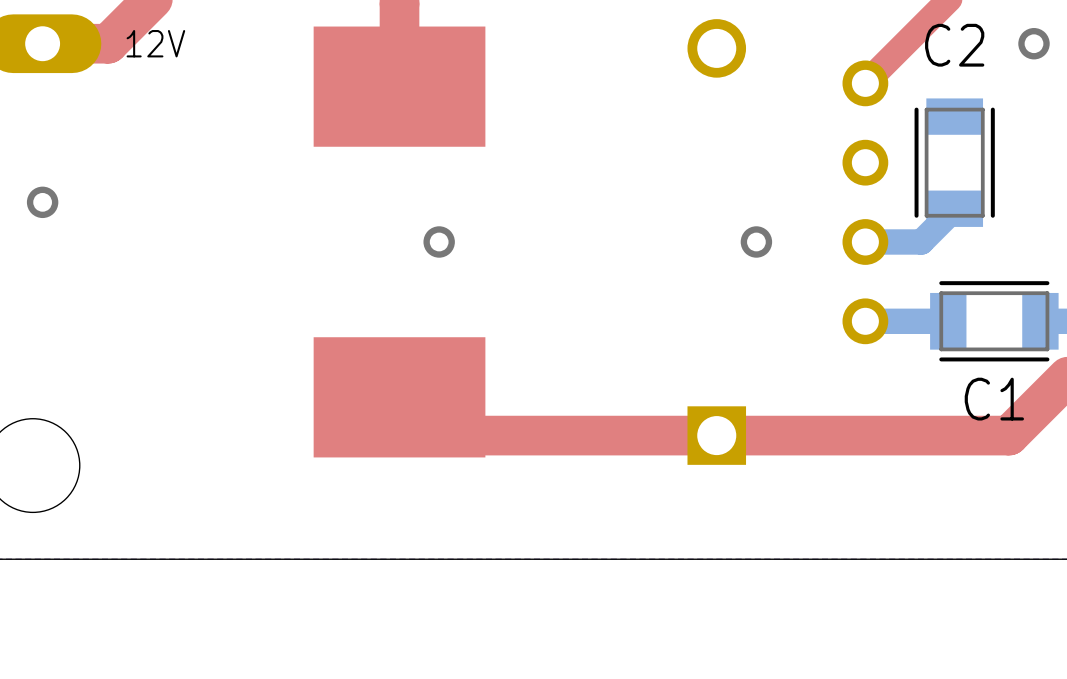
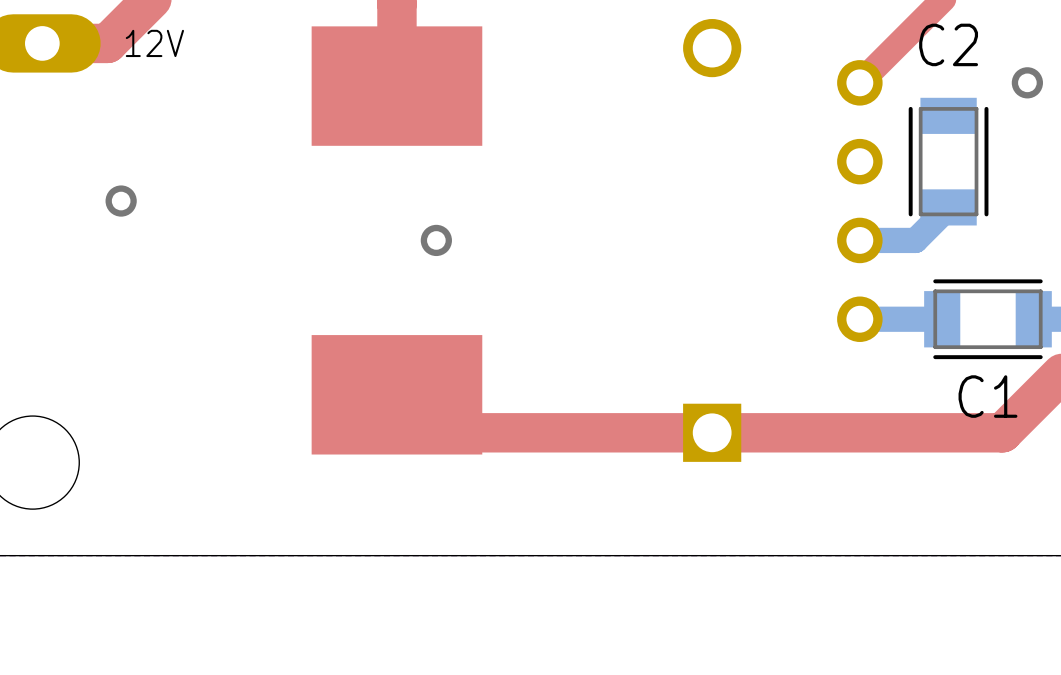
via position: (1034, 43) -> (1027, 82)
via position: (42, 202) -> (121, 201)
via: (756, 241) -> none

